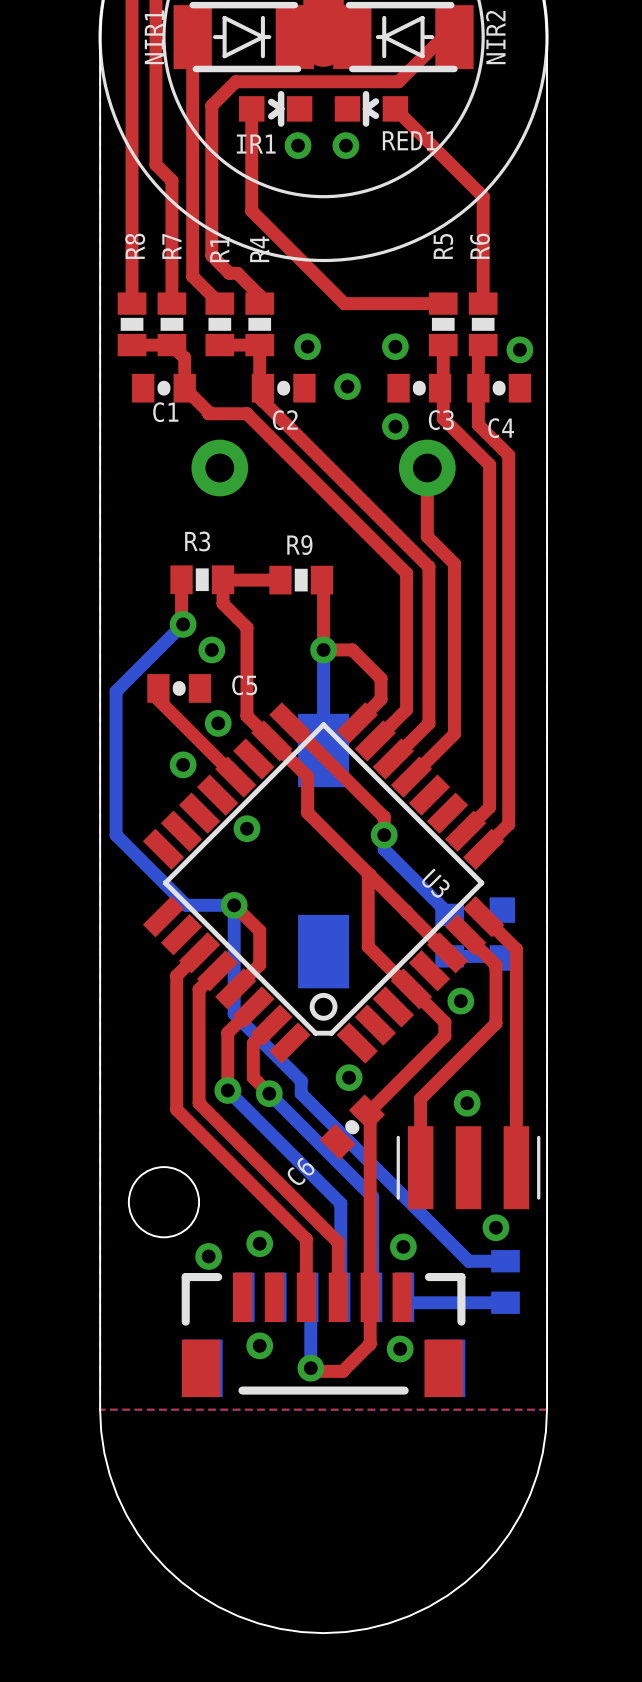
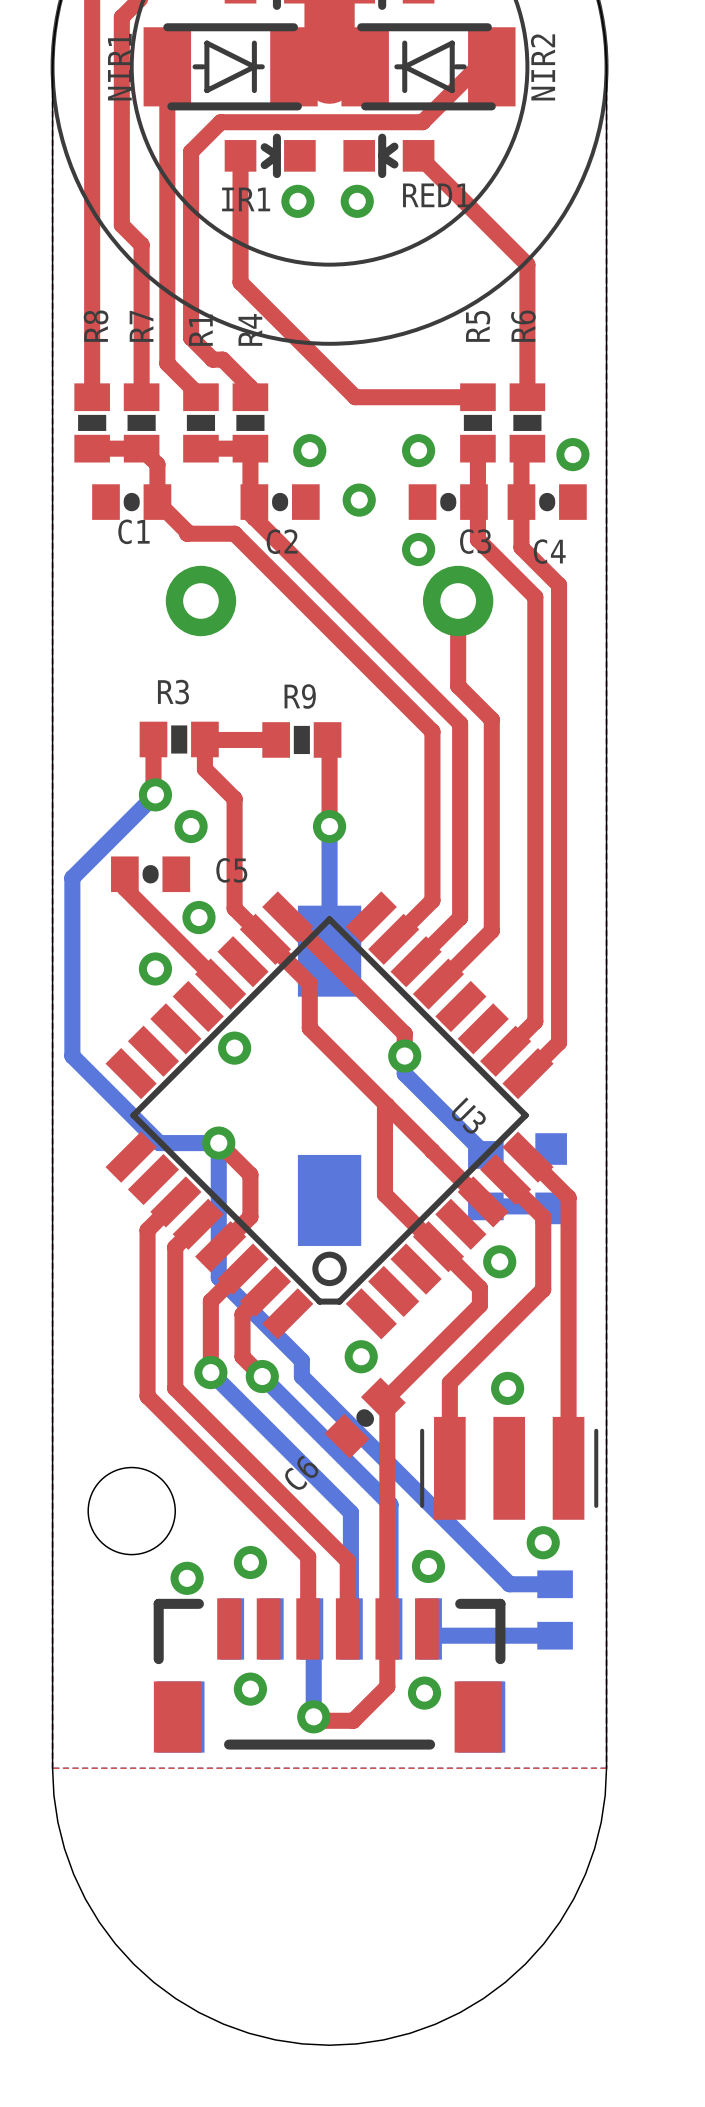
top track: (323, 649) (352, 649) (381, 678) (381, 699) (357, 722) -> none

